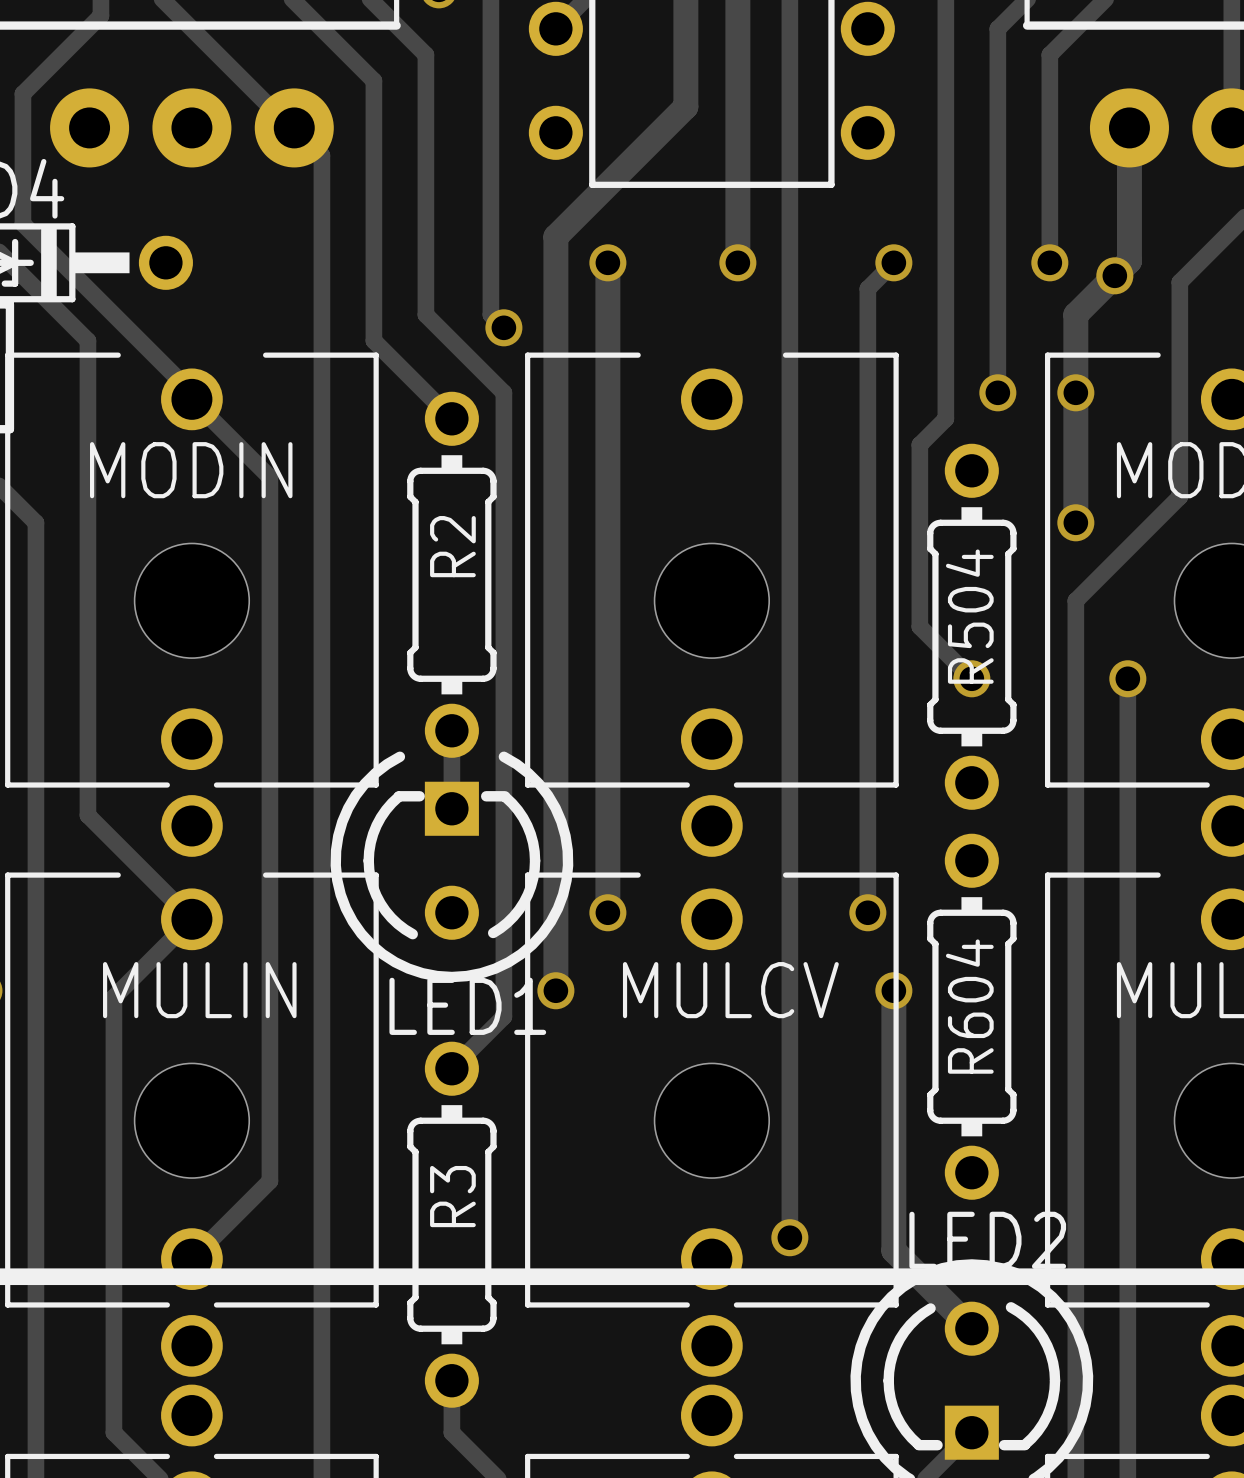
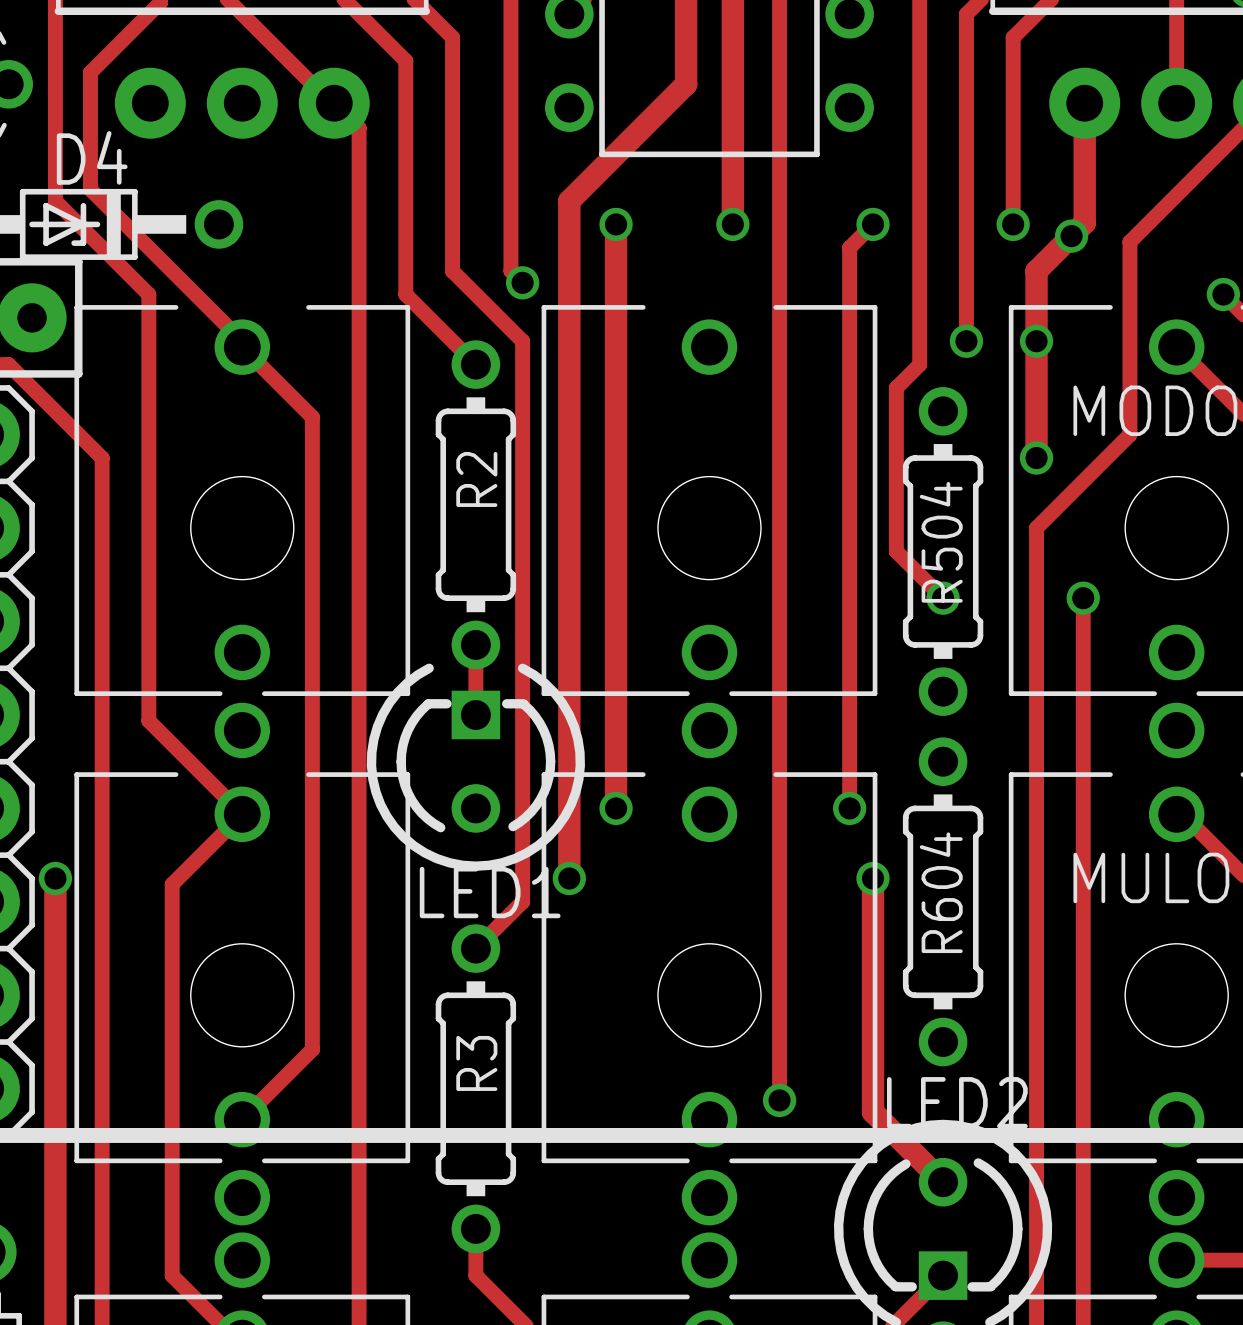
MODIN name: MODIN (191, 470) -> none
MULIN name: MULIN (199, 990) -> none
MULCV name: MULCV (730, 990) -> none

